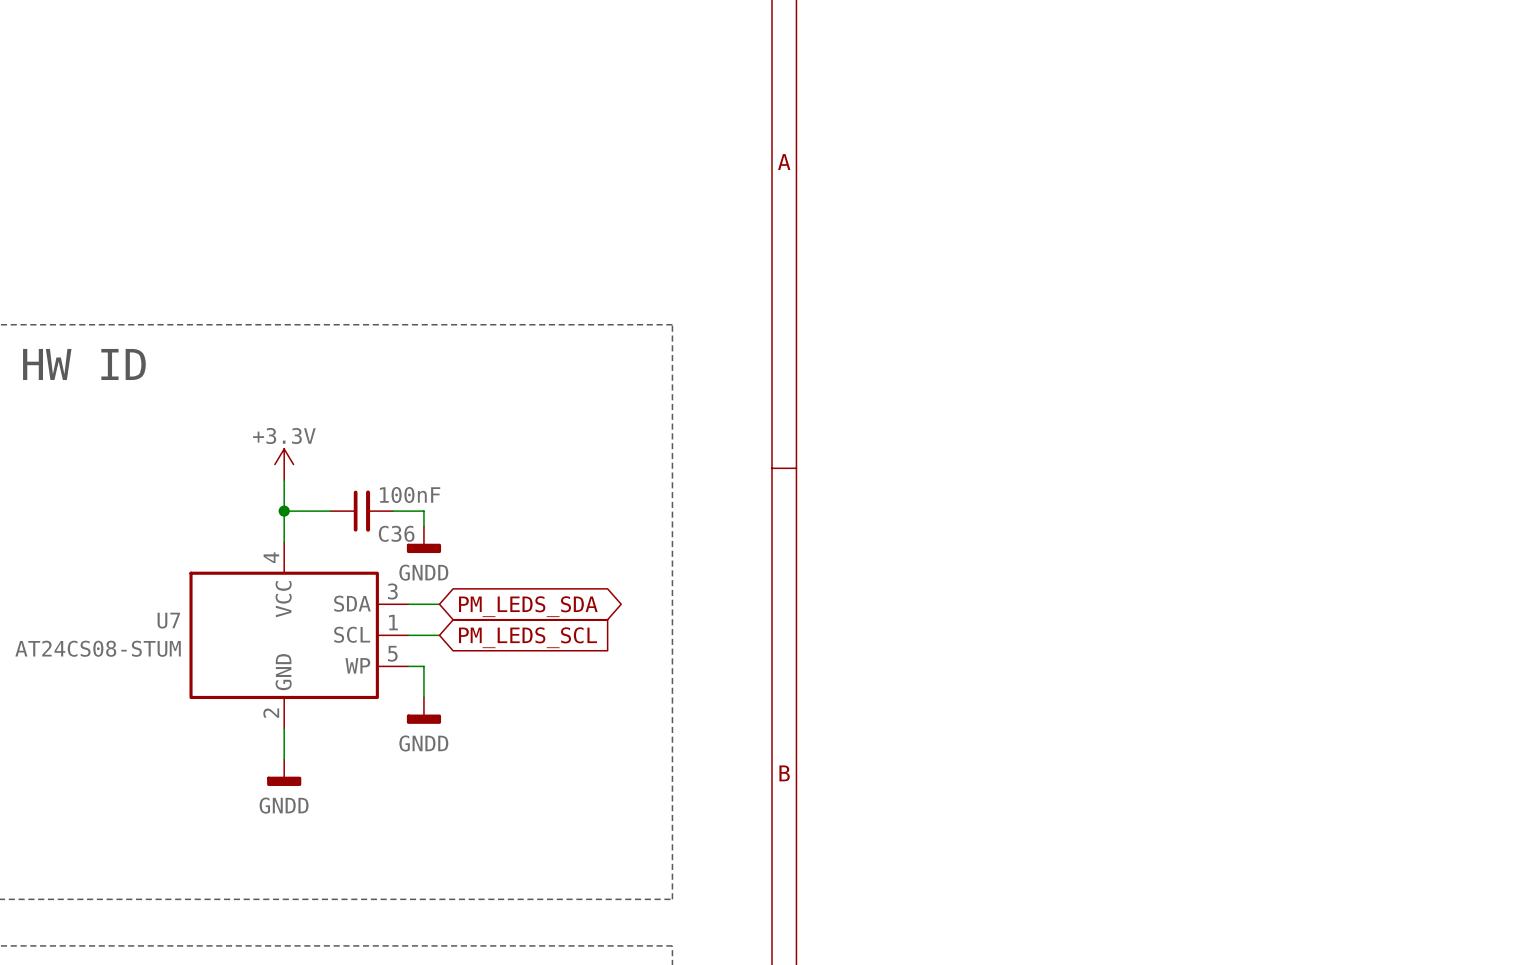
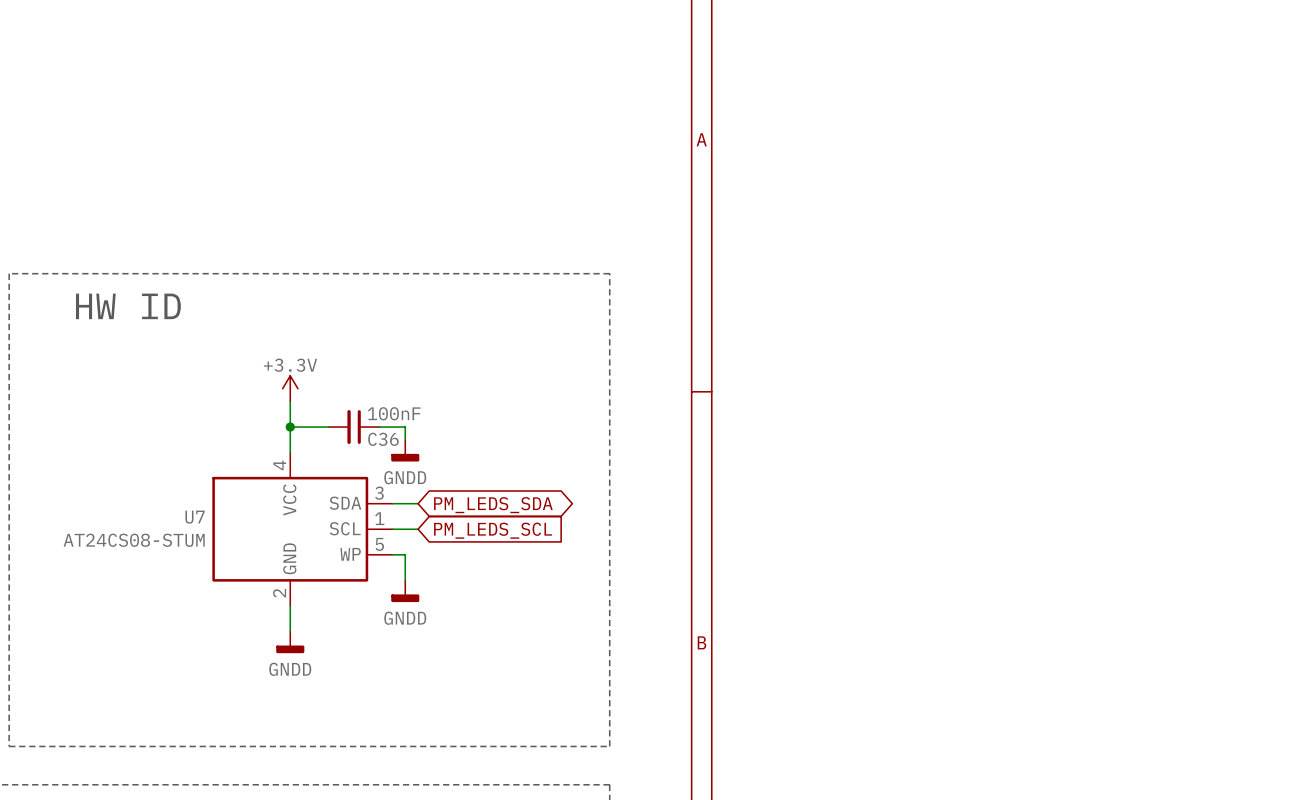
C36 rotation: 0° (361, 511) -> 180° (354, 427)

